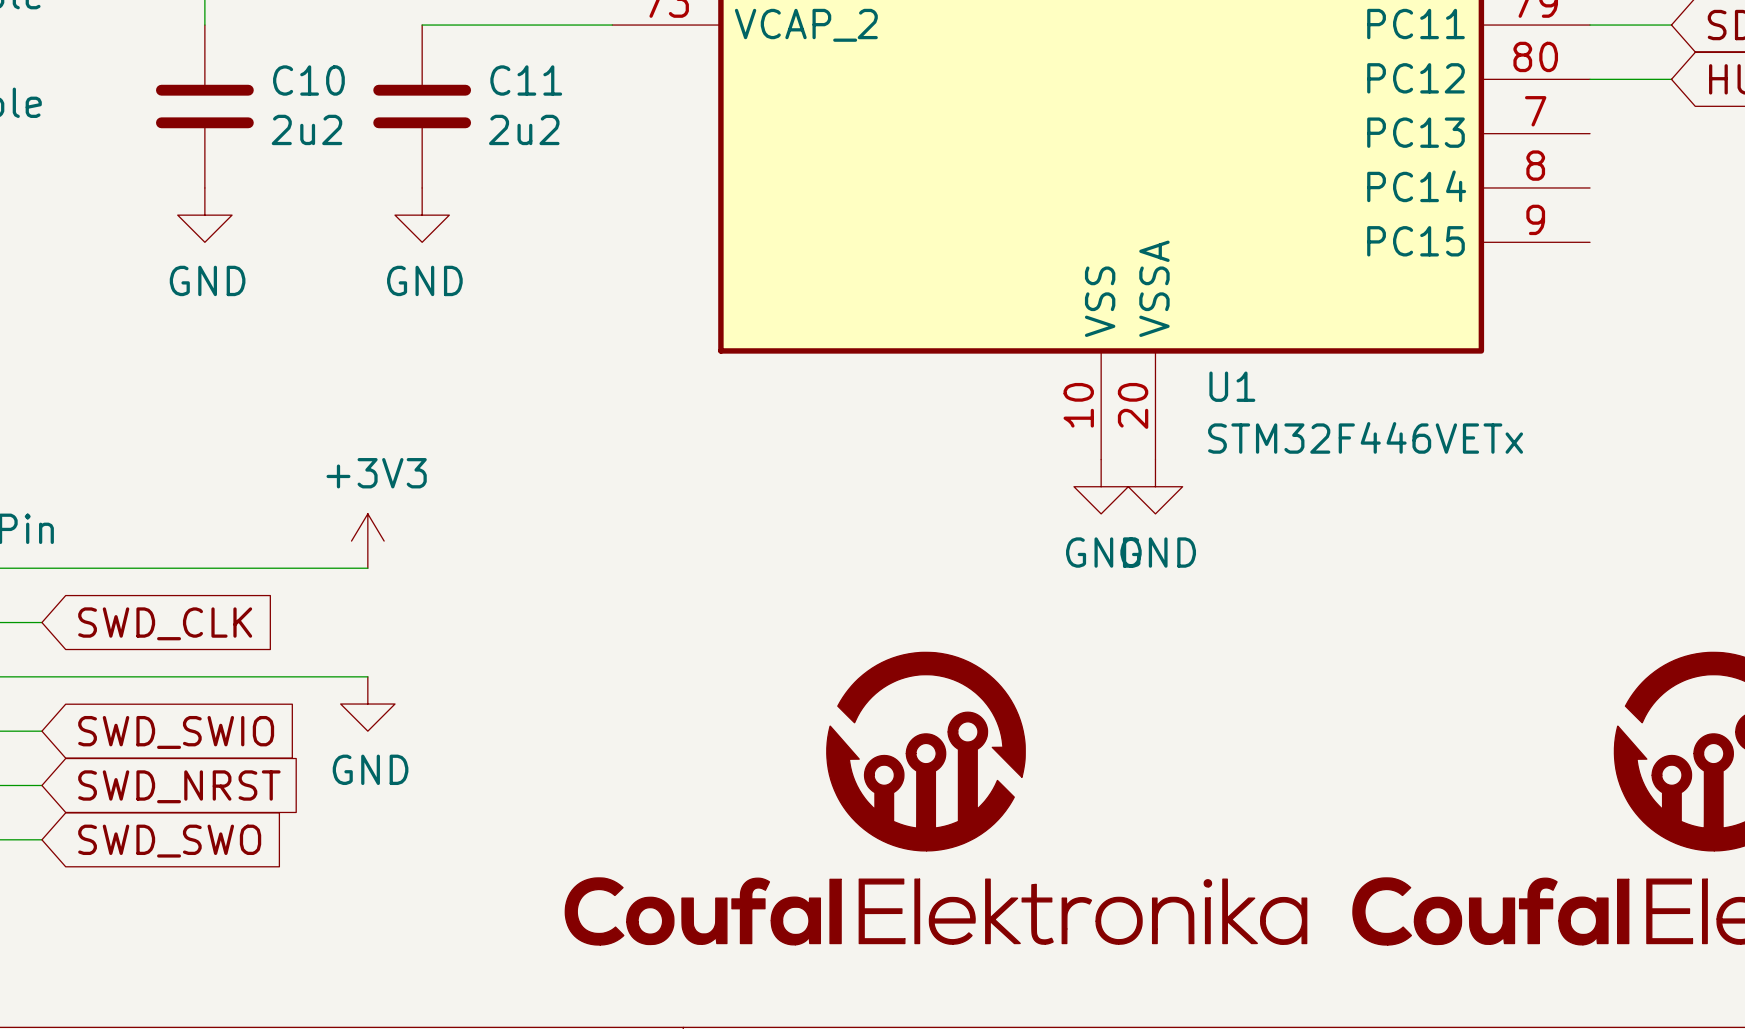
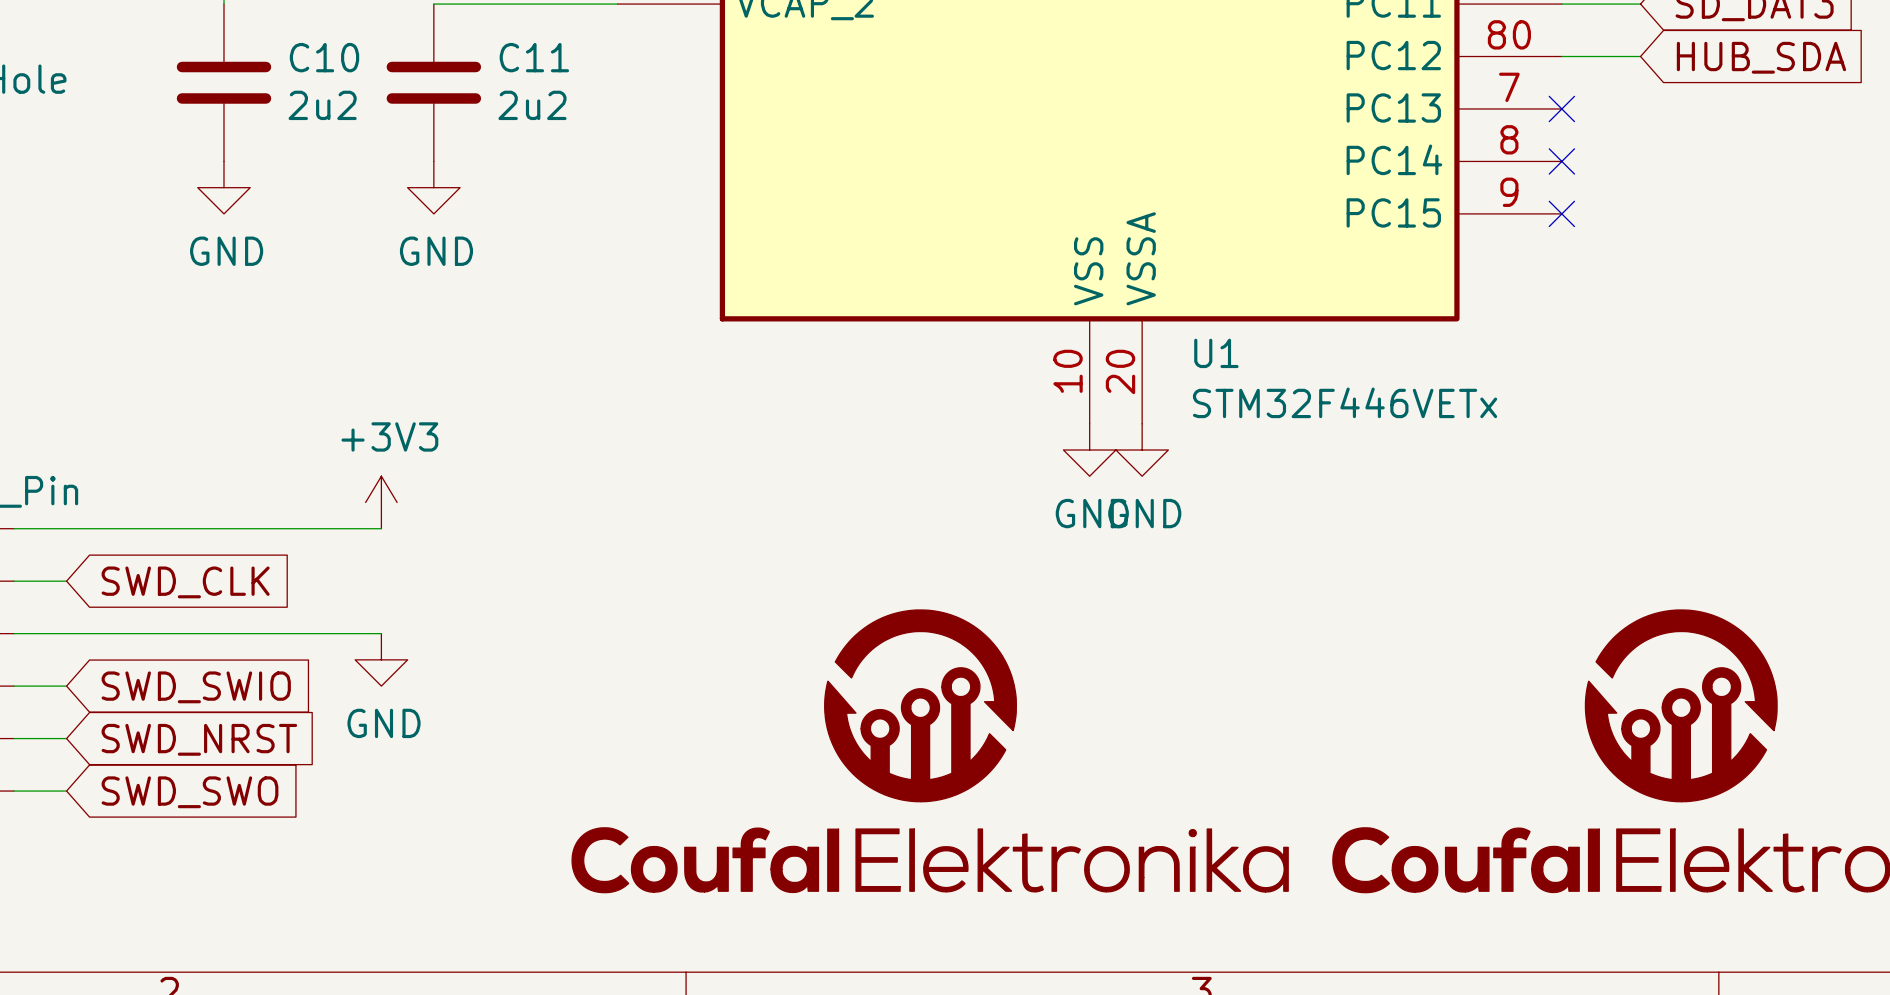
no-connect mark: none -> (1561, 108)
no-connect mark: none -> (1561, 161)
no-connect mark: none -> (1561, 213)

